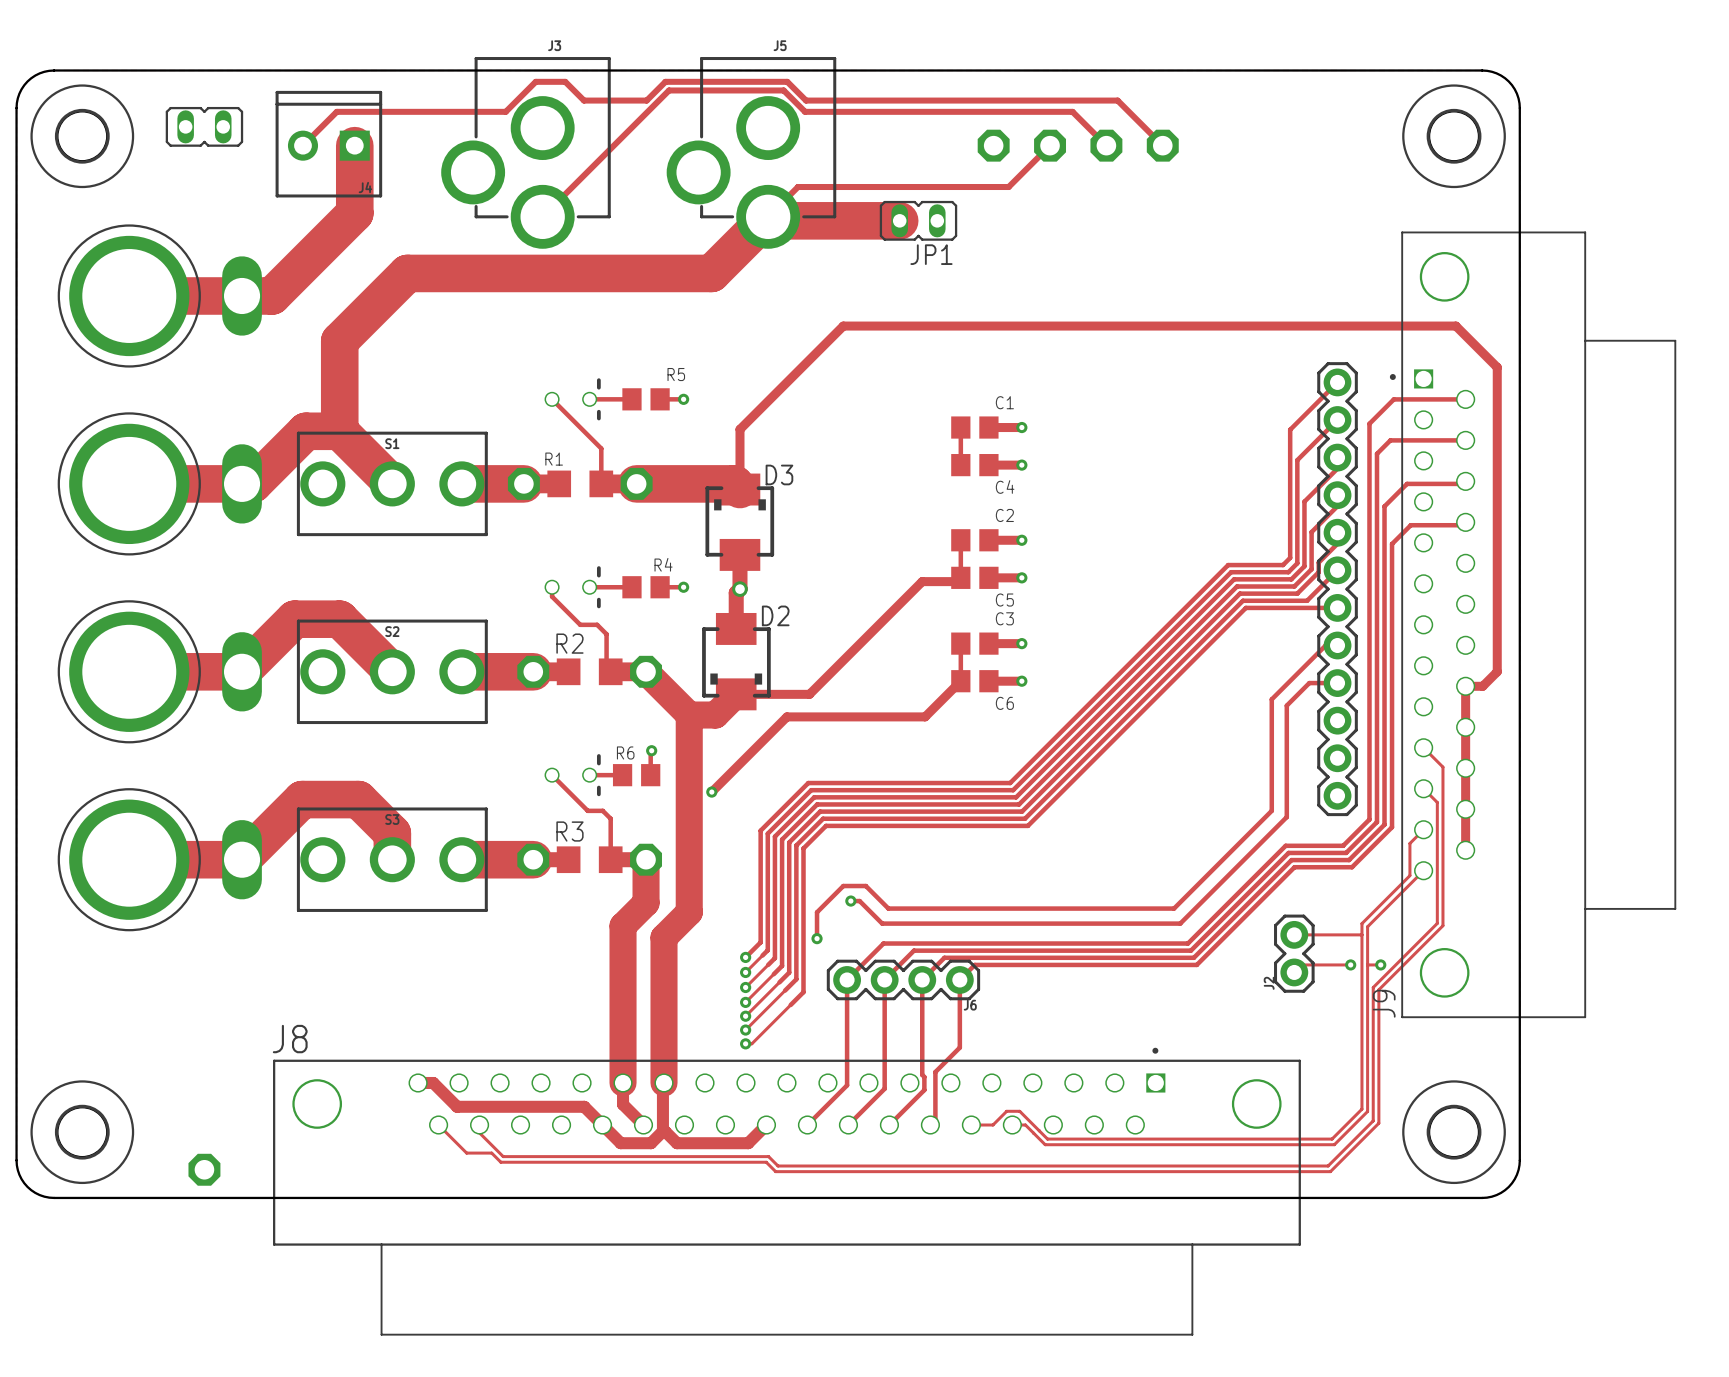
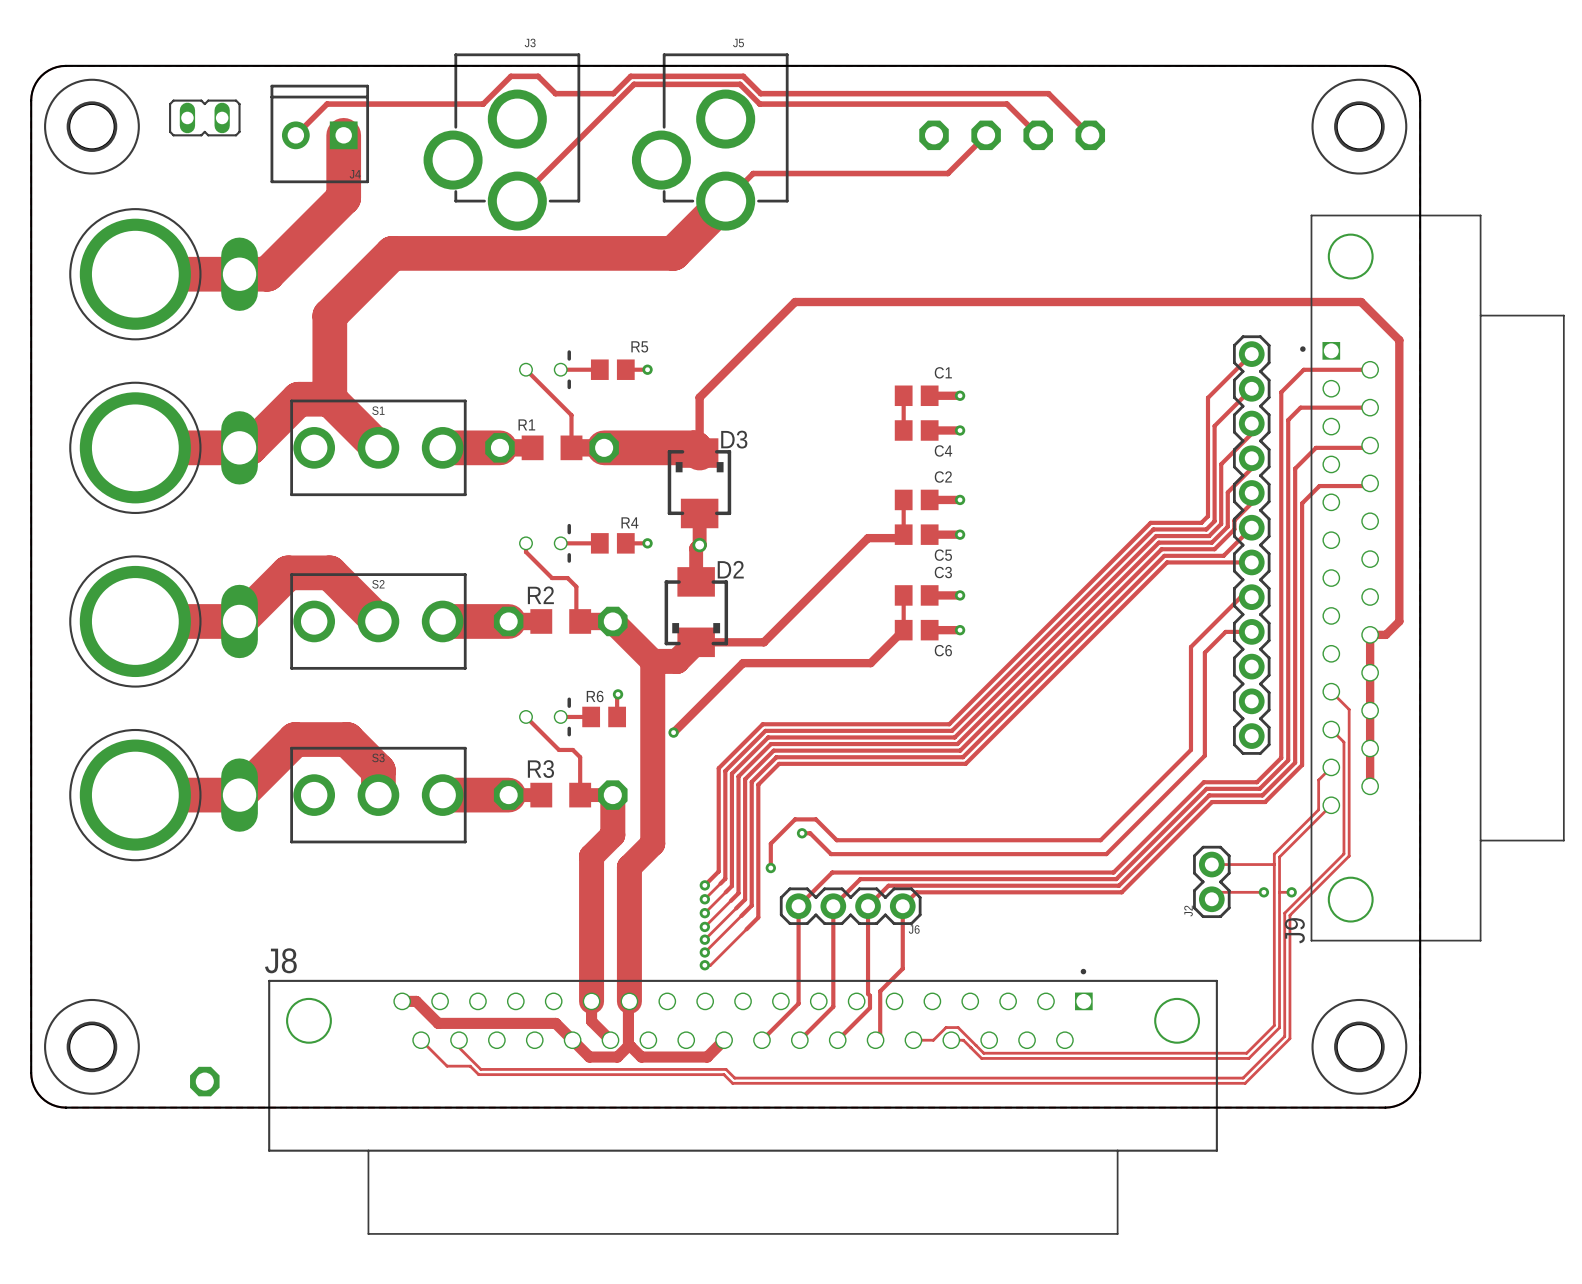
track: (769, 215) (775, 220) (899, 220) -> none
JP1: (918, 220) -> none

